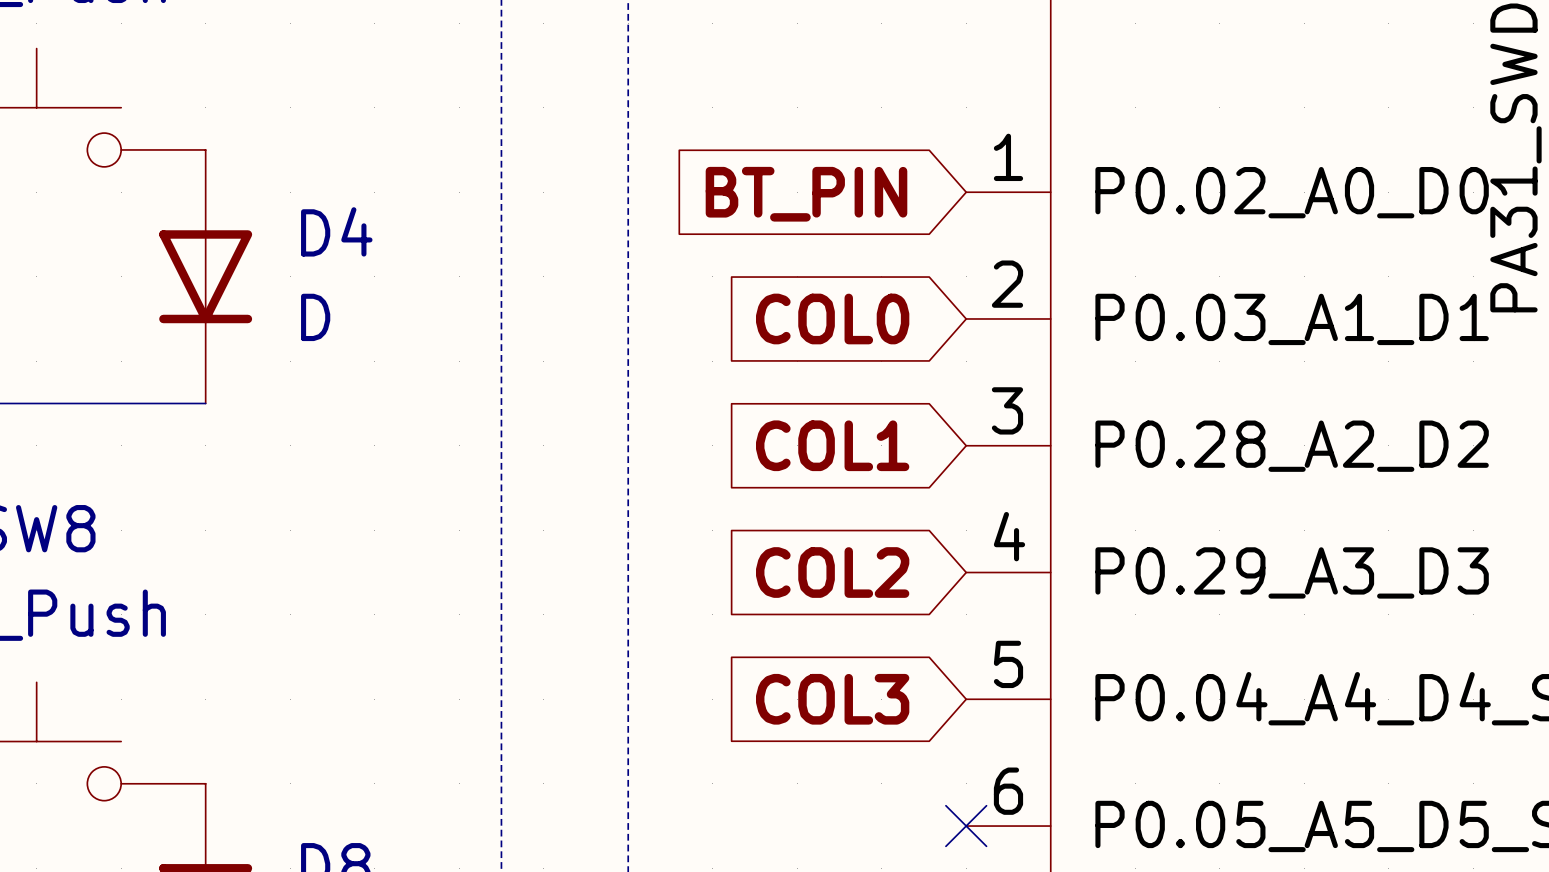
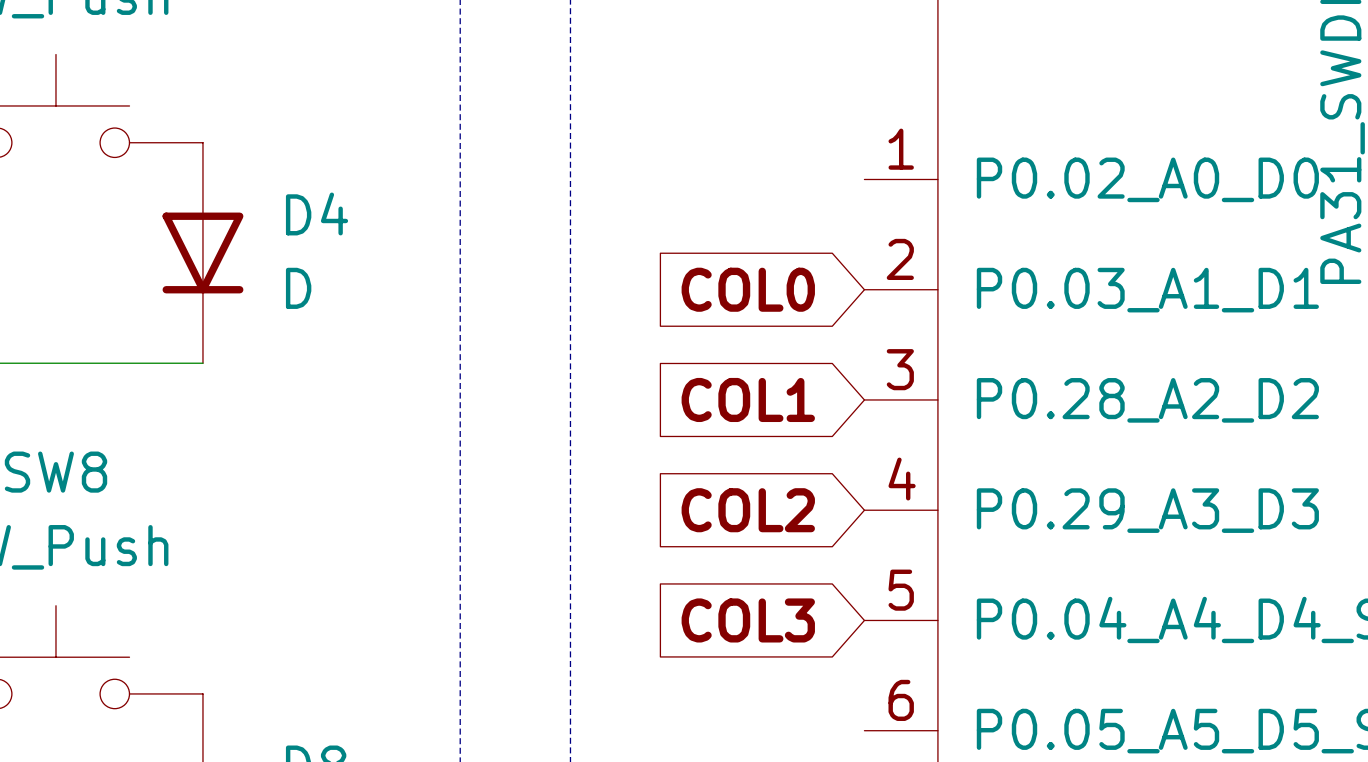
global label: BT_PIN (806, 194) -> none
no-connect mark: (966, 826) -> none

